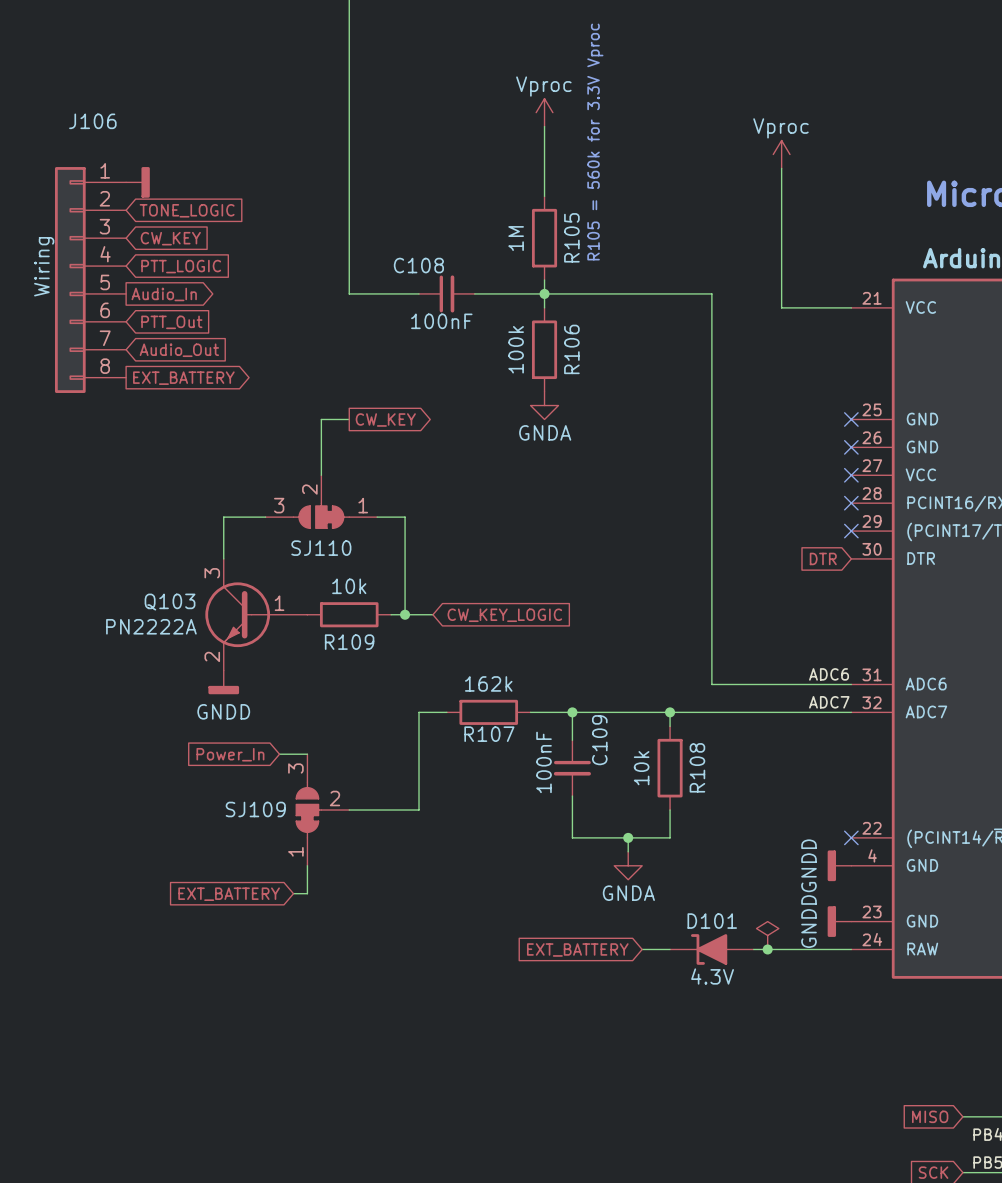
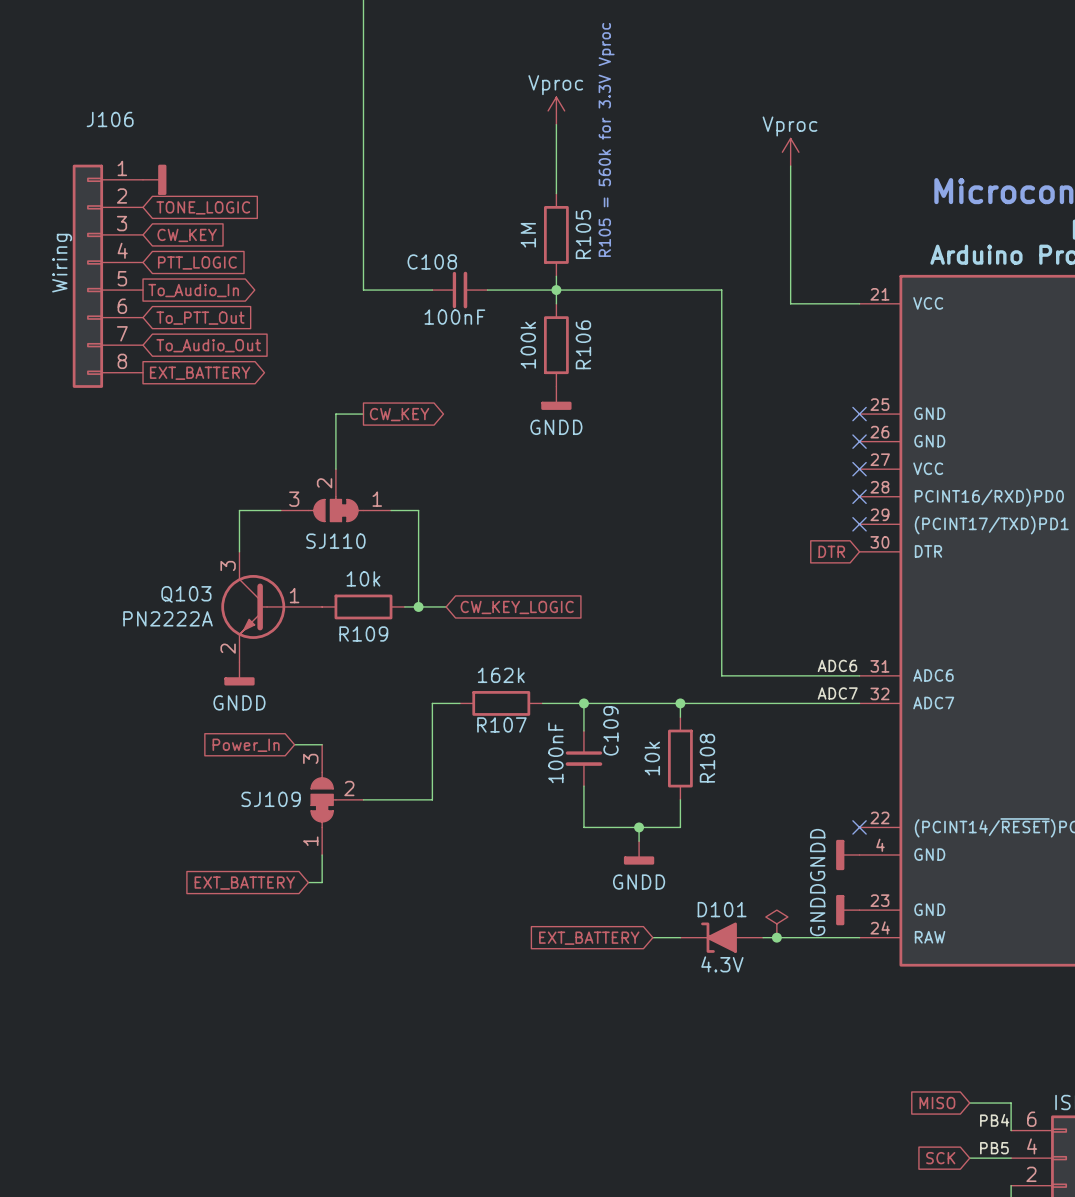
global label: Audio_In (164, 294) -> To_Audio_In (193, 290)
global label: PTT_Out (171, 322) -> To_PTT_Out (200, 318)
global label: Audio_Out (179, 350) -> To_Audio_Out (208, 345)
power symbol: GNDA (544, 405) -> GNDD (556, 398)
power symbol: GNDA (628, 865) -> GNDD (639, 852)

